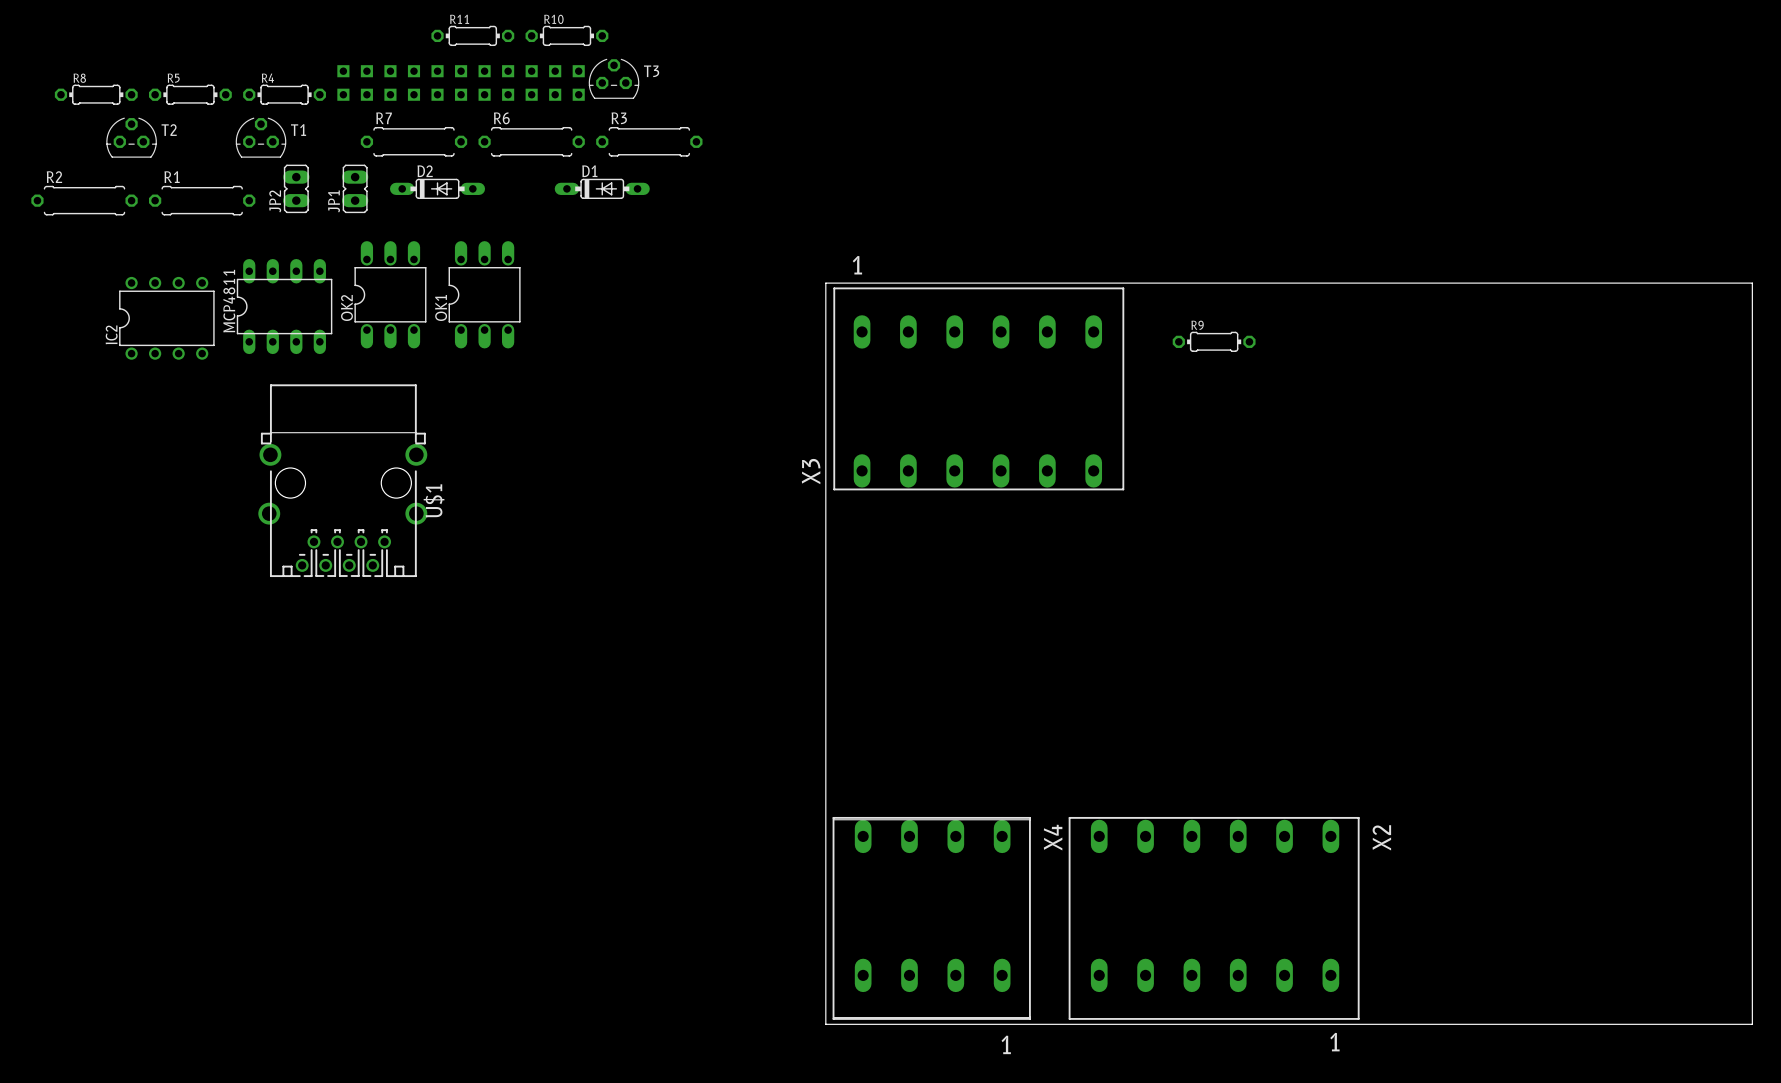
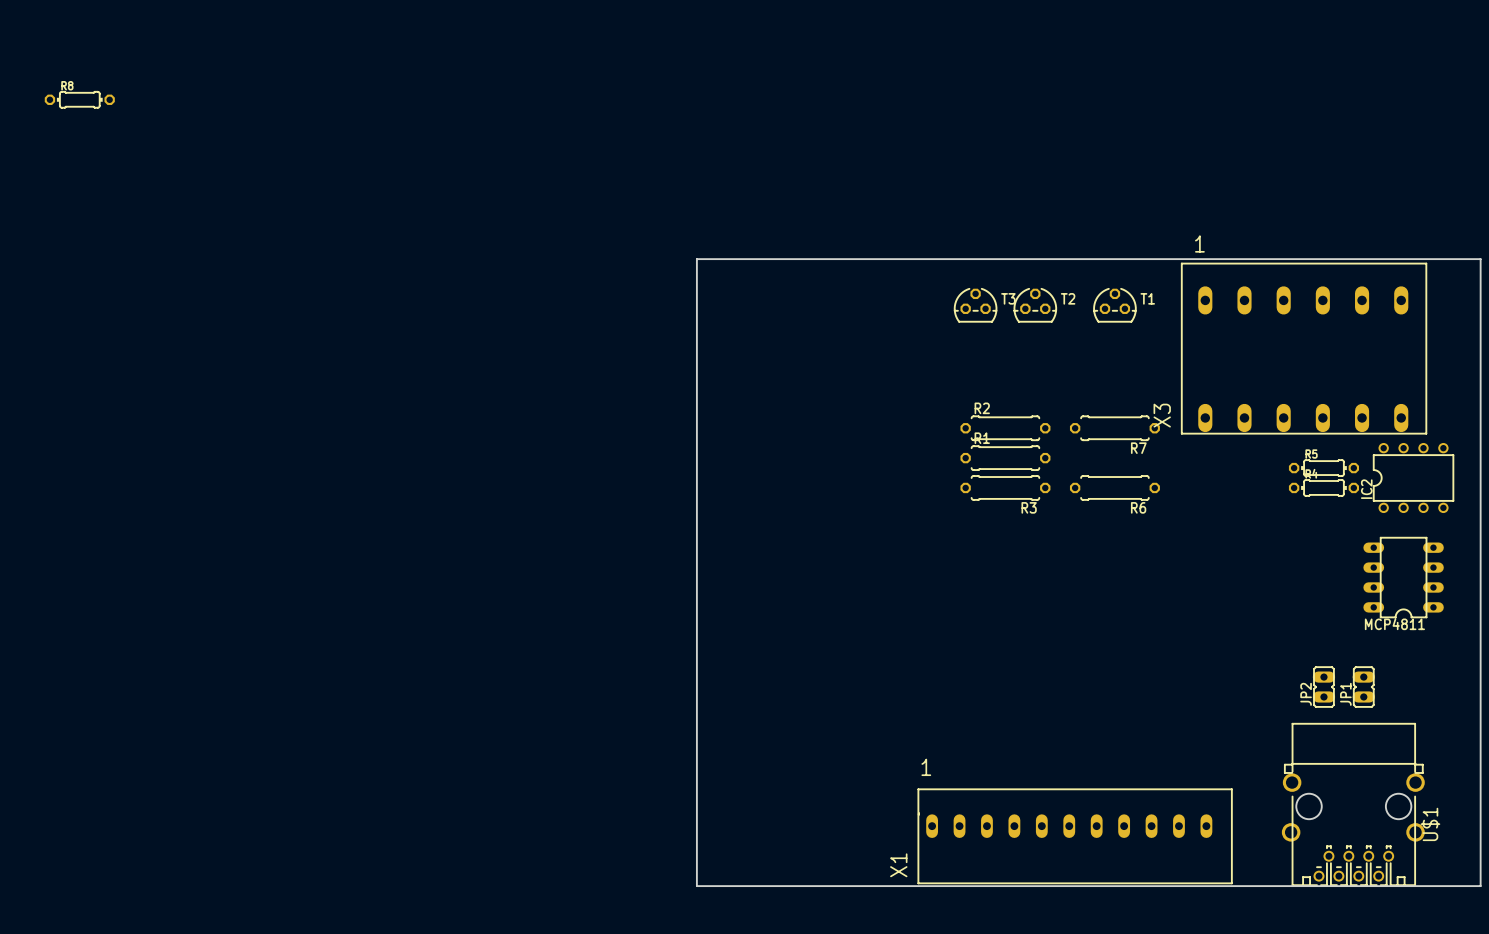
R11: (472, 35) -> none
R10: (566, 35) -> none
T3 position: (614, 78) -> (975, 305)
part: (461, 82) -> none
R5 position: (190, 94) -> (1323, 468)
R4 position: (284, 94) -> (1323, 487)
R7 name position: R7 (384, 118) -> R7 (1138, 448)
R6 name position: R6 (501, 118) -> R6 (1138, 507)
R3 name position: R3 (619, 118) -> R3 (1029, 507)
T2 position: (131, 137) -> (1035, 305)
T1 position: (260, 137) -> (1114, 305)
R7 position: (413, 141) -> (1114, 428)
R6 position: (531, 141) -> (1114, 487)
R3 position: (649, 141) -> (1005, 487)
JP2 position: (296, 188) -> (1323, 687)
JP1 position: (355, 188) -> (1363, 687)
D2: (437, 188) -> none
D1: (602, 188) -> none
R2 position: (84, 200) -> (1005, 428)
R1 position: (202, 200) -> (1005, 458)
OK2: (390, 294) -> none
OK1: (484, 294) -> none
MCP4811 rotation: 0° (284, 306) -> 90° counterclockwise (1403, 577)
MCP4811 position: (284, 306) -> (1403, 577)
IC2 position: (166, 318) -> (1413, 478)
R9: (1214, 341) -> none
X3 position: (978, 388) -> (1304, 348)
U$1 position: (342, 480) -> (1353, 804)
X4: (931, 918) -> none
X2: (1214, 918) -> none
X1: none -> (1075, 836)

